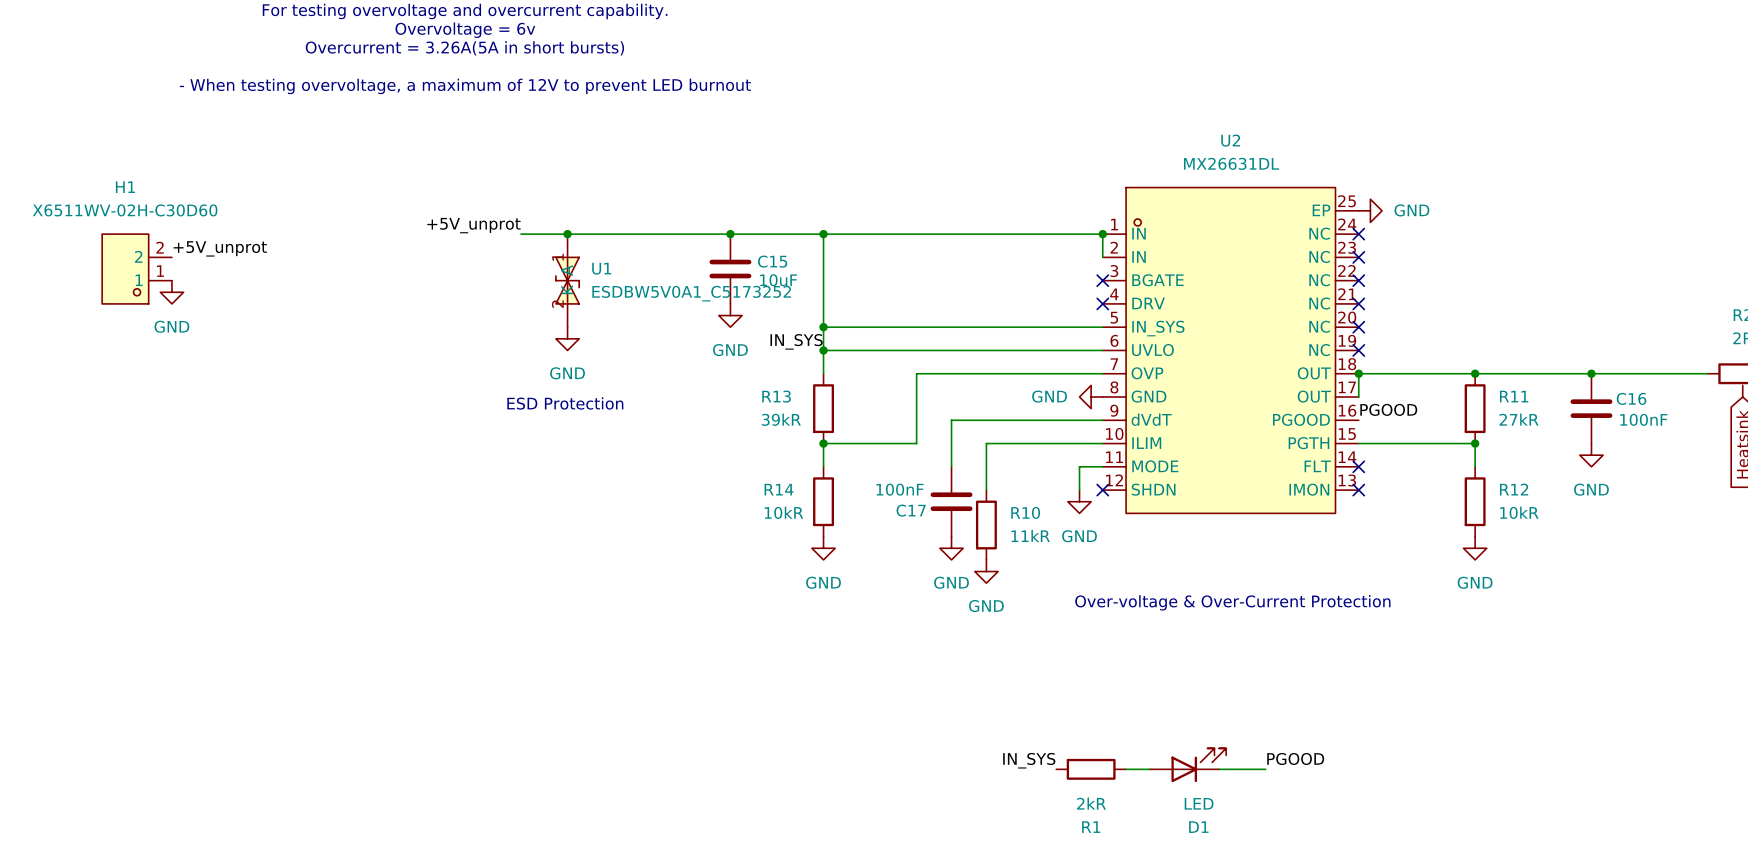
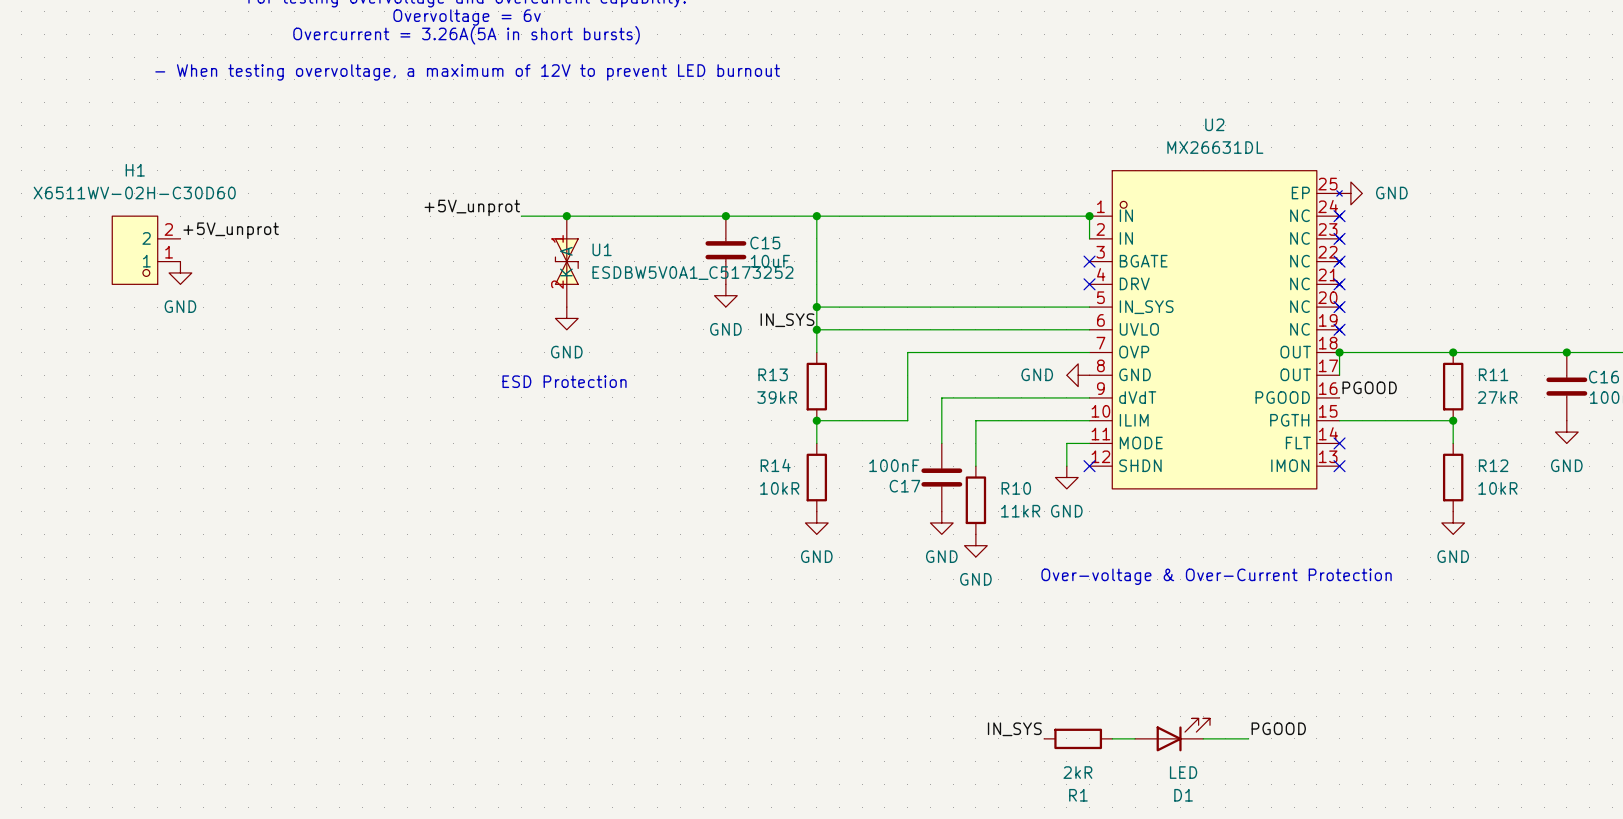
U2 symbol: [1102, 187, 1359, 514] -> [1089, 170, 1343, 489]

